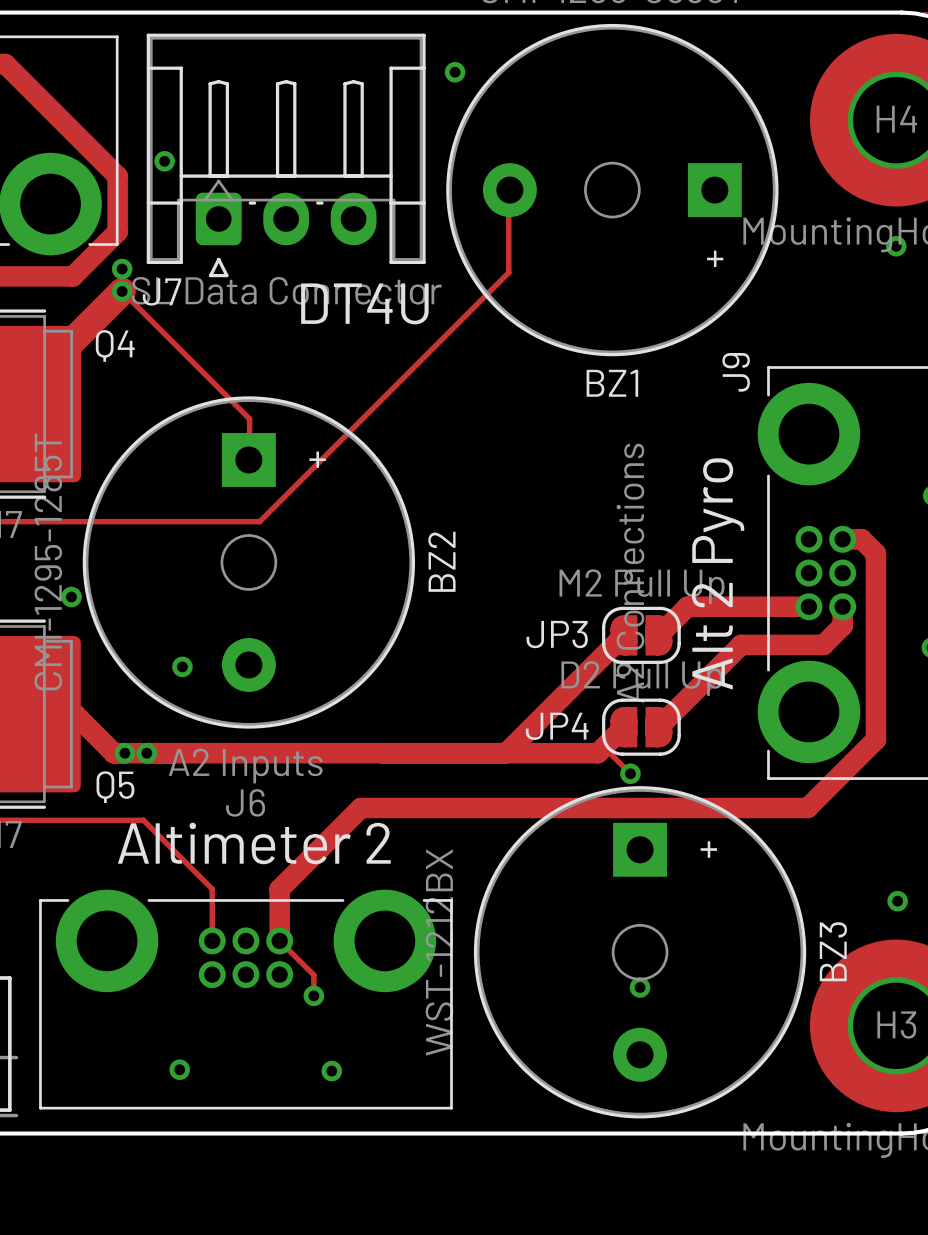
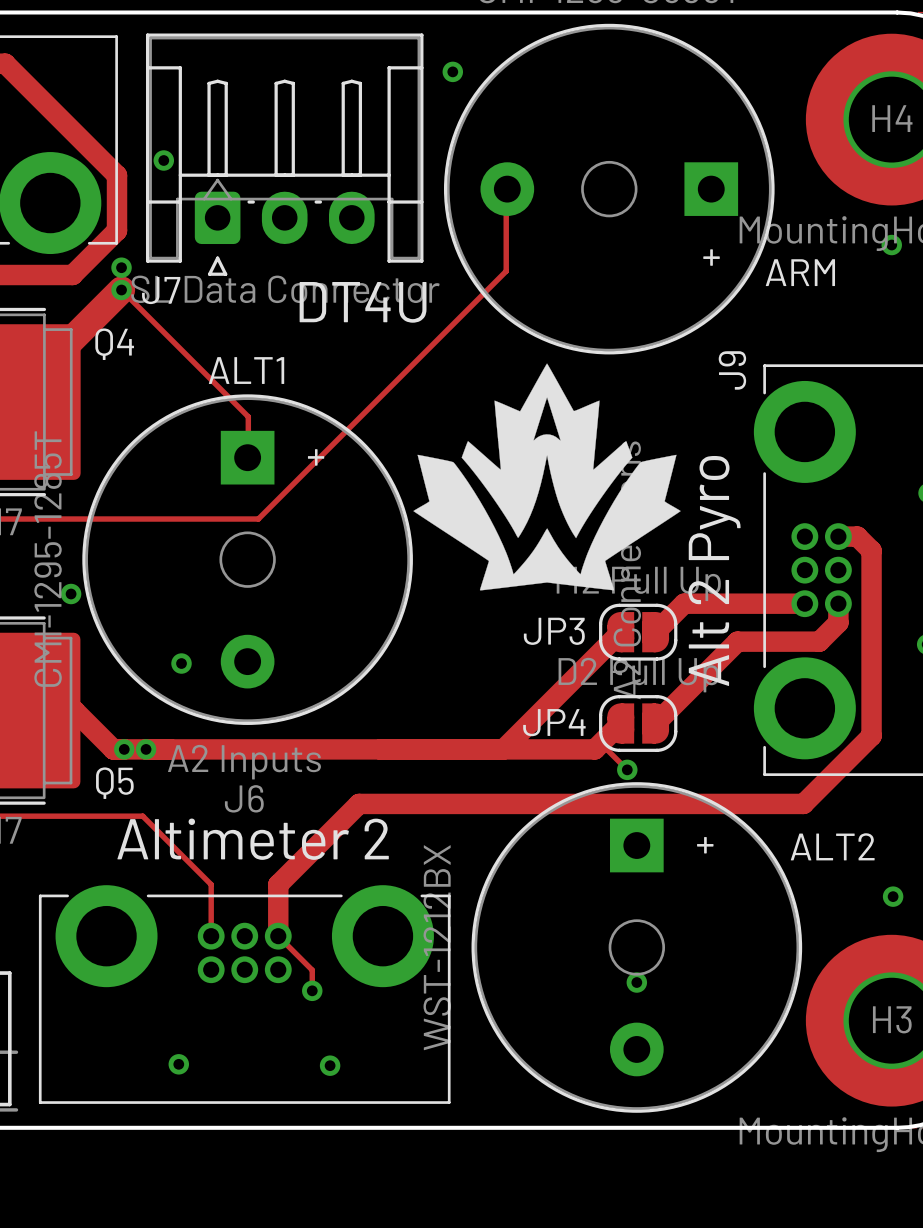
drawing: none -> [413, 363, 681, 591]
BZ1 name: BZ1 (612, 383) -> ARM (800, 272)
BZ2 name: BZ2 (441, 561) -> ALT1 (246, 370)
BZ3 name: BZ3 (833, 951) -> ALT2 (832, 846)

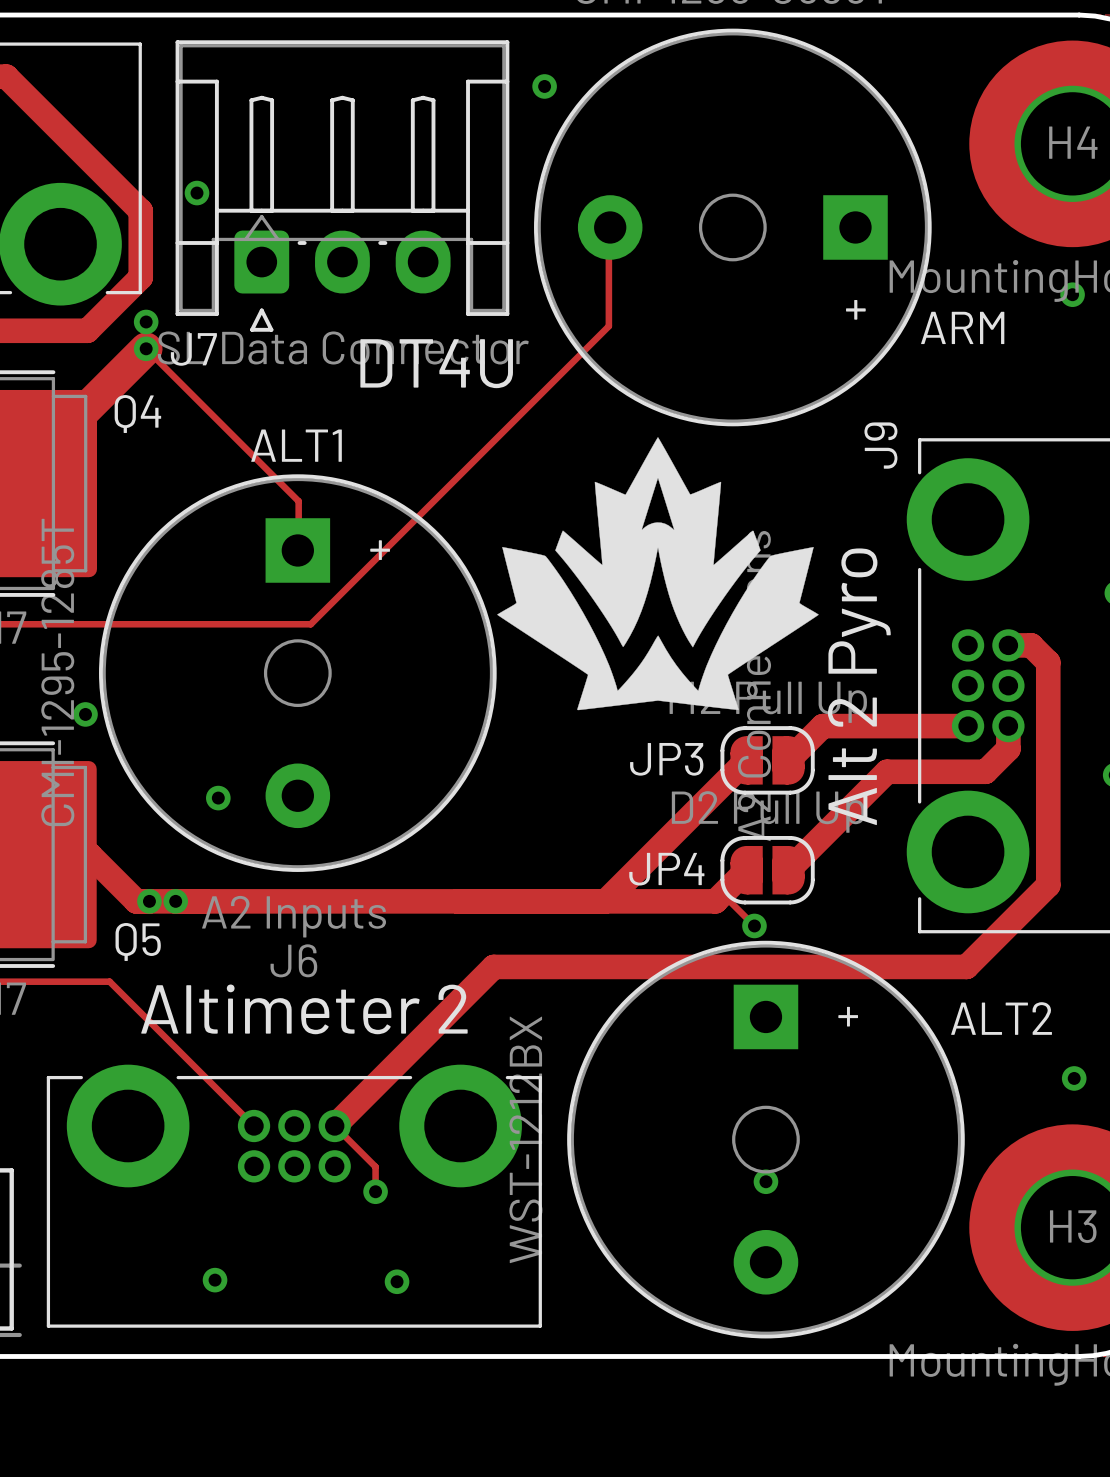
track: (410, 803) (359, 803) (278, 884) (278, 936) -> (493, 966) (334, 1126)
track: (91, 816) (142, 816) (211, 884) (211, 936) -> (109, 981) (254, 1126)

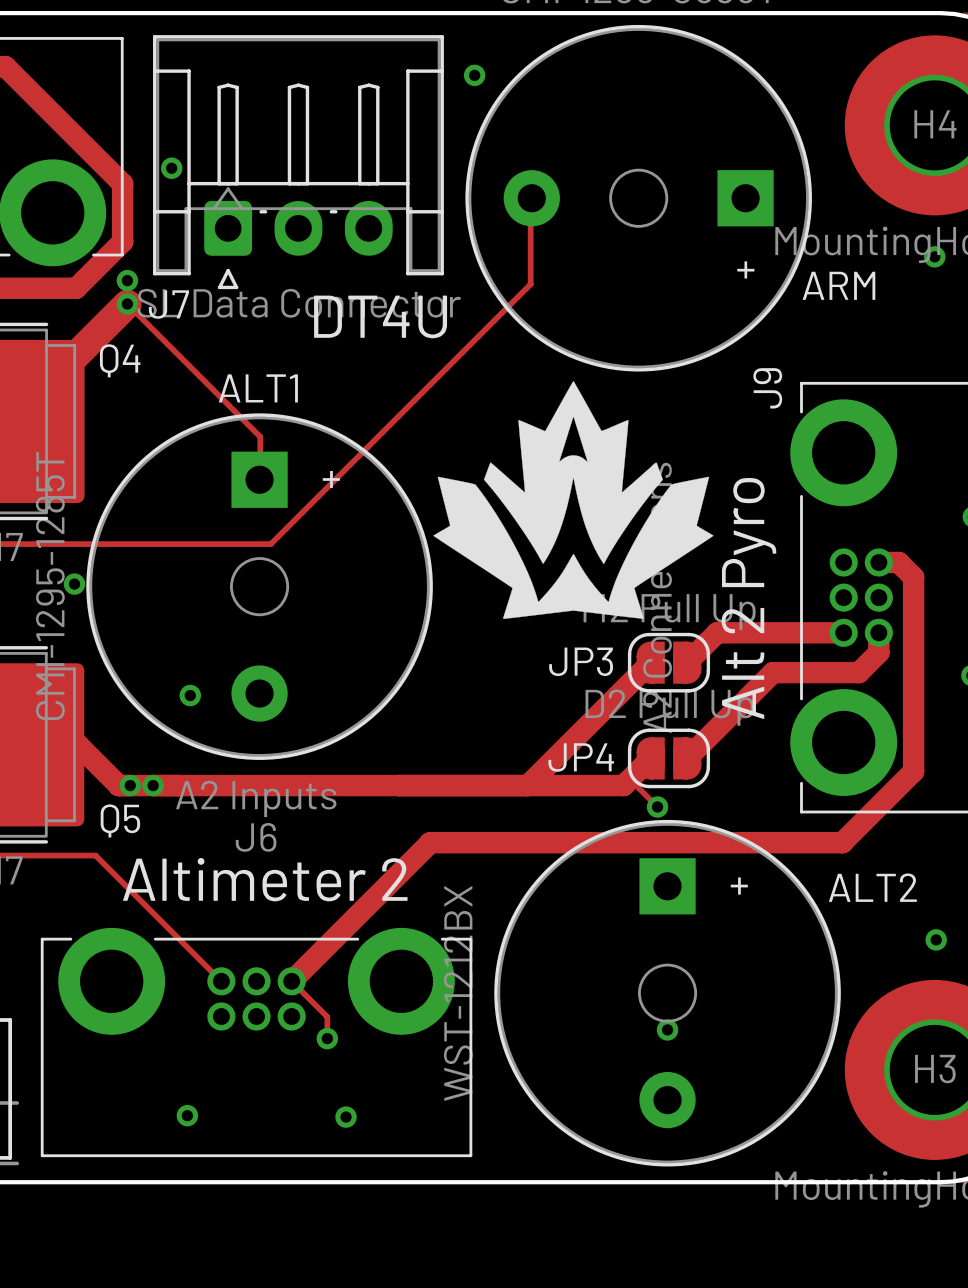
via position: (85, 714) -> (74, 584)

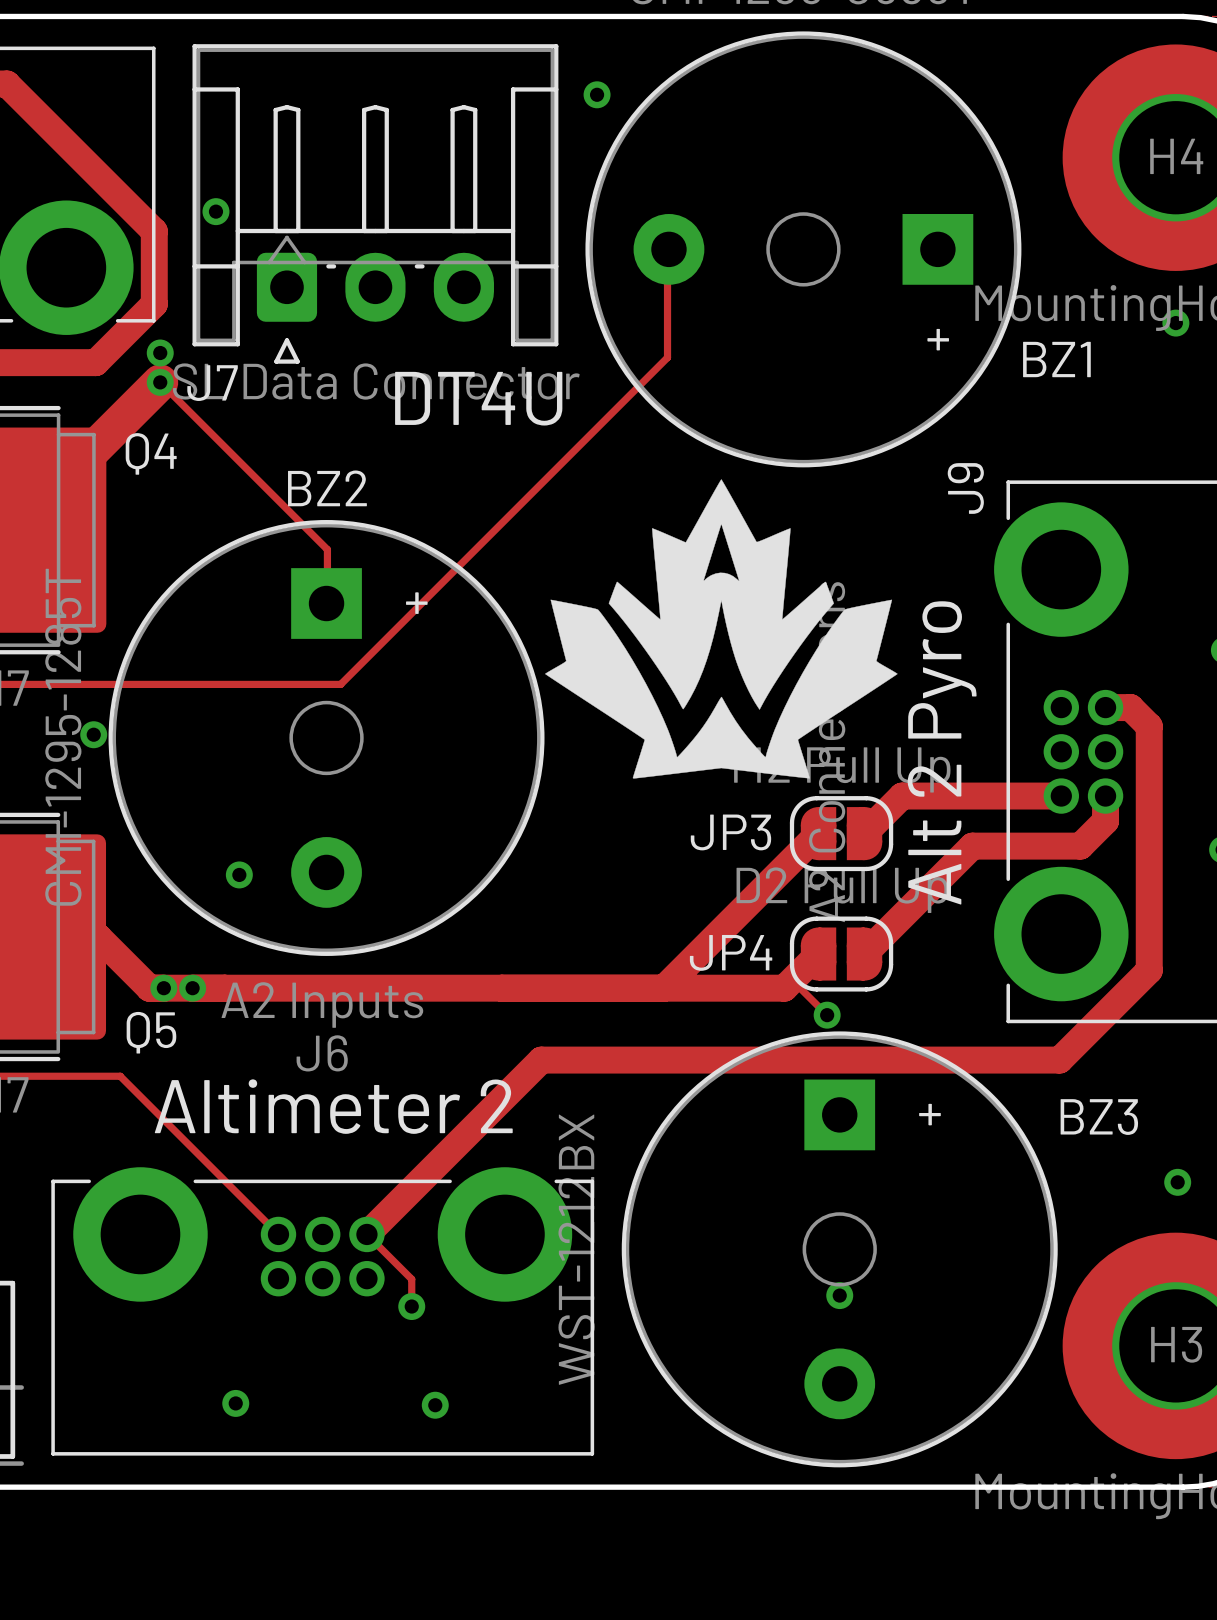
ARM name: ARM (838, 285) -> BZ1 (1056, 359)
ALT1 name: ALT1 (258, 388) -> BZ2 (327, 488)
ALT2 name: ALT2 (872, 887) -> BZ3 (1099, 1117)

